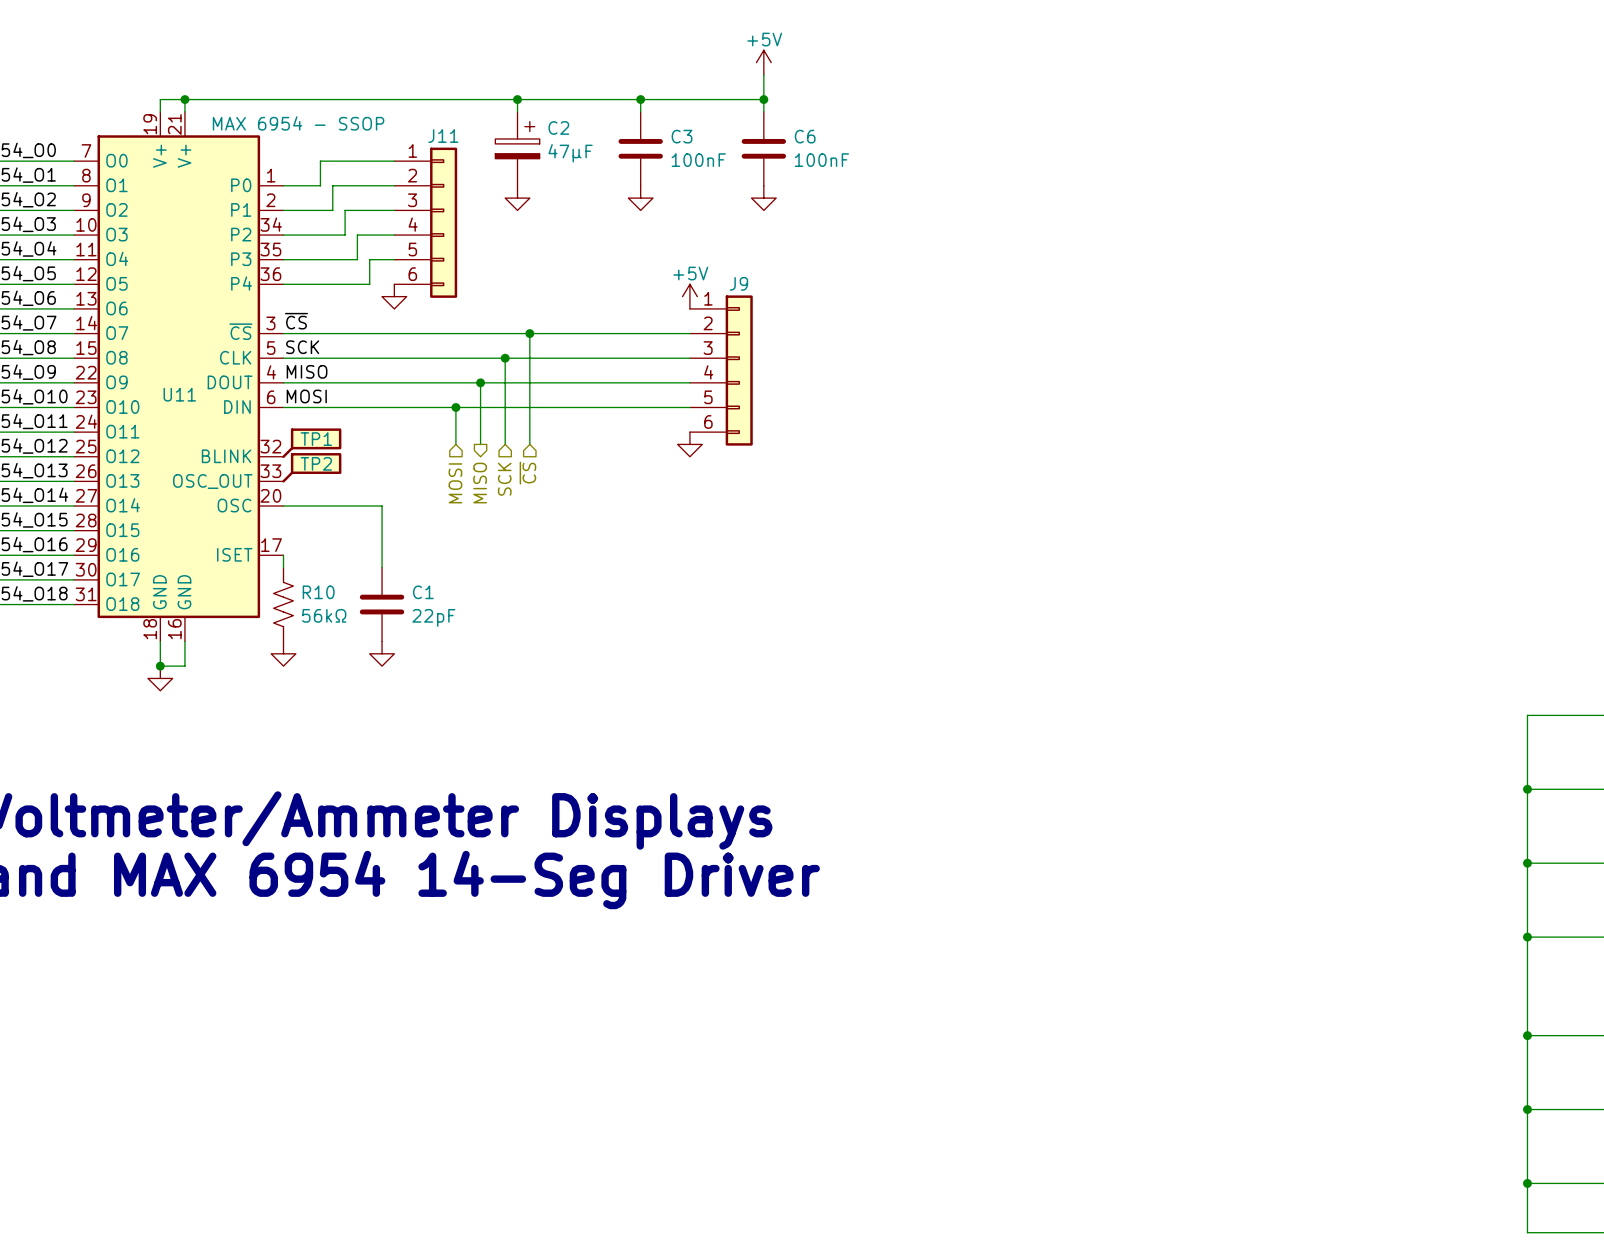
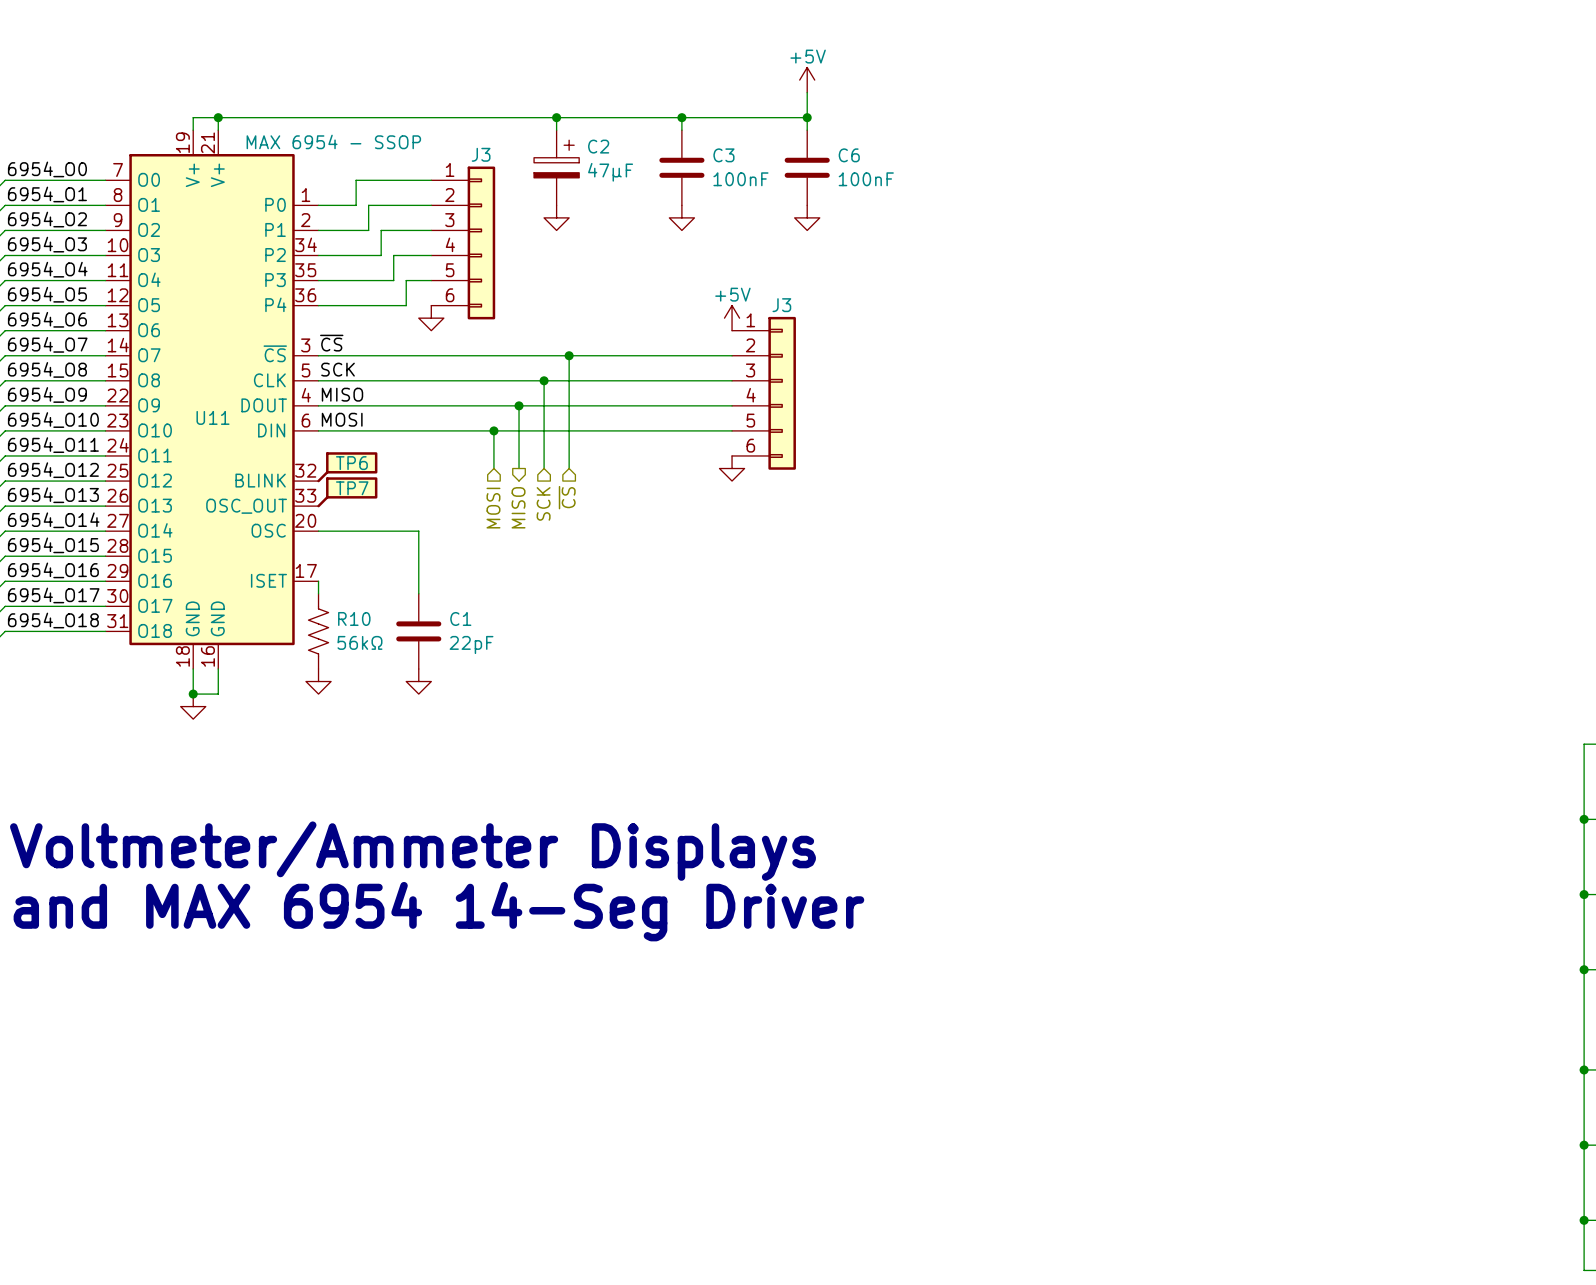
J11 name: J11 (443, 136) -> J3 (481, 154)
J9 name: J9 (738, 283) -> J3 (781, 305)
TP1 name: TP1 (316, 439) -> TP6 (351, 463)
TP2 name: TP2 (316, 463) -> TP7 (352, 488)

